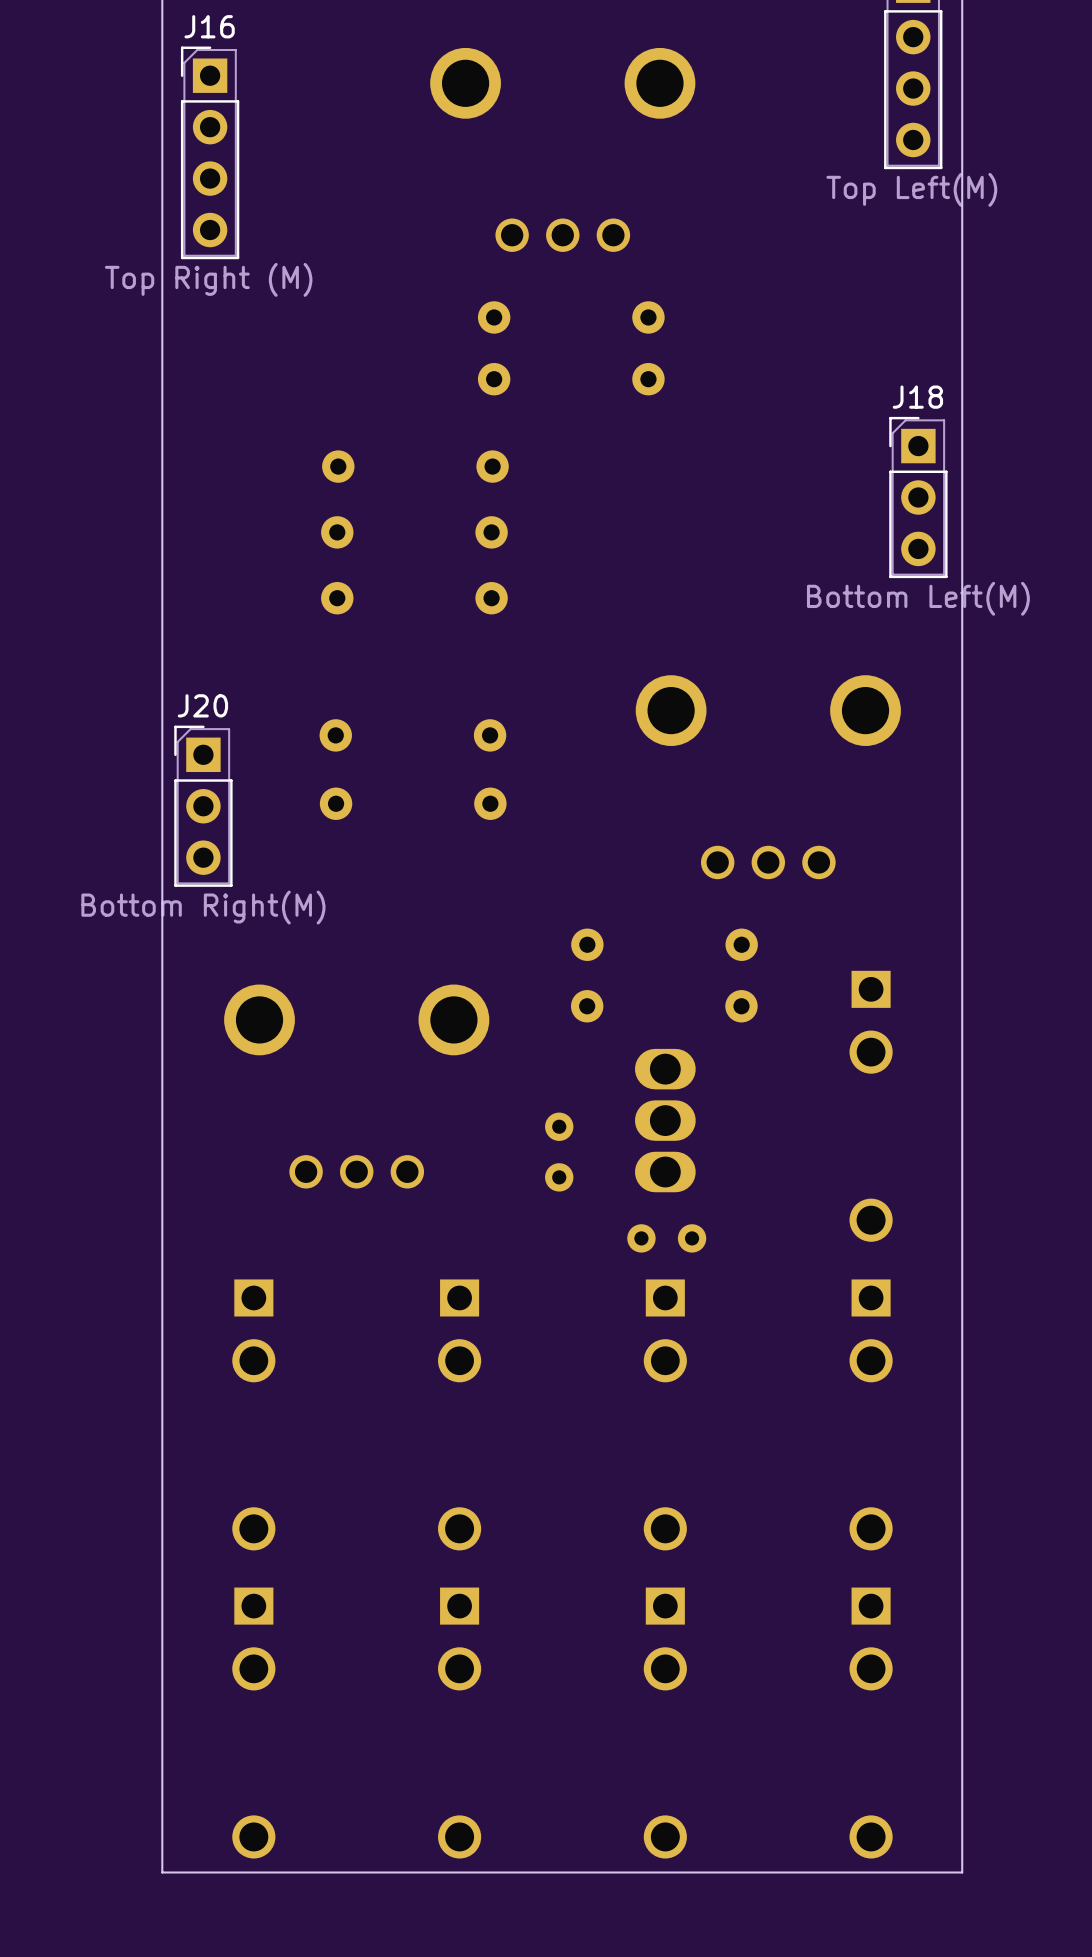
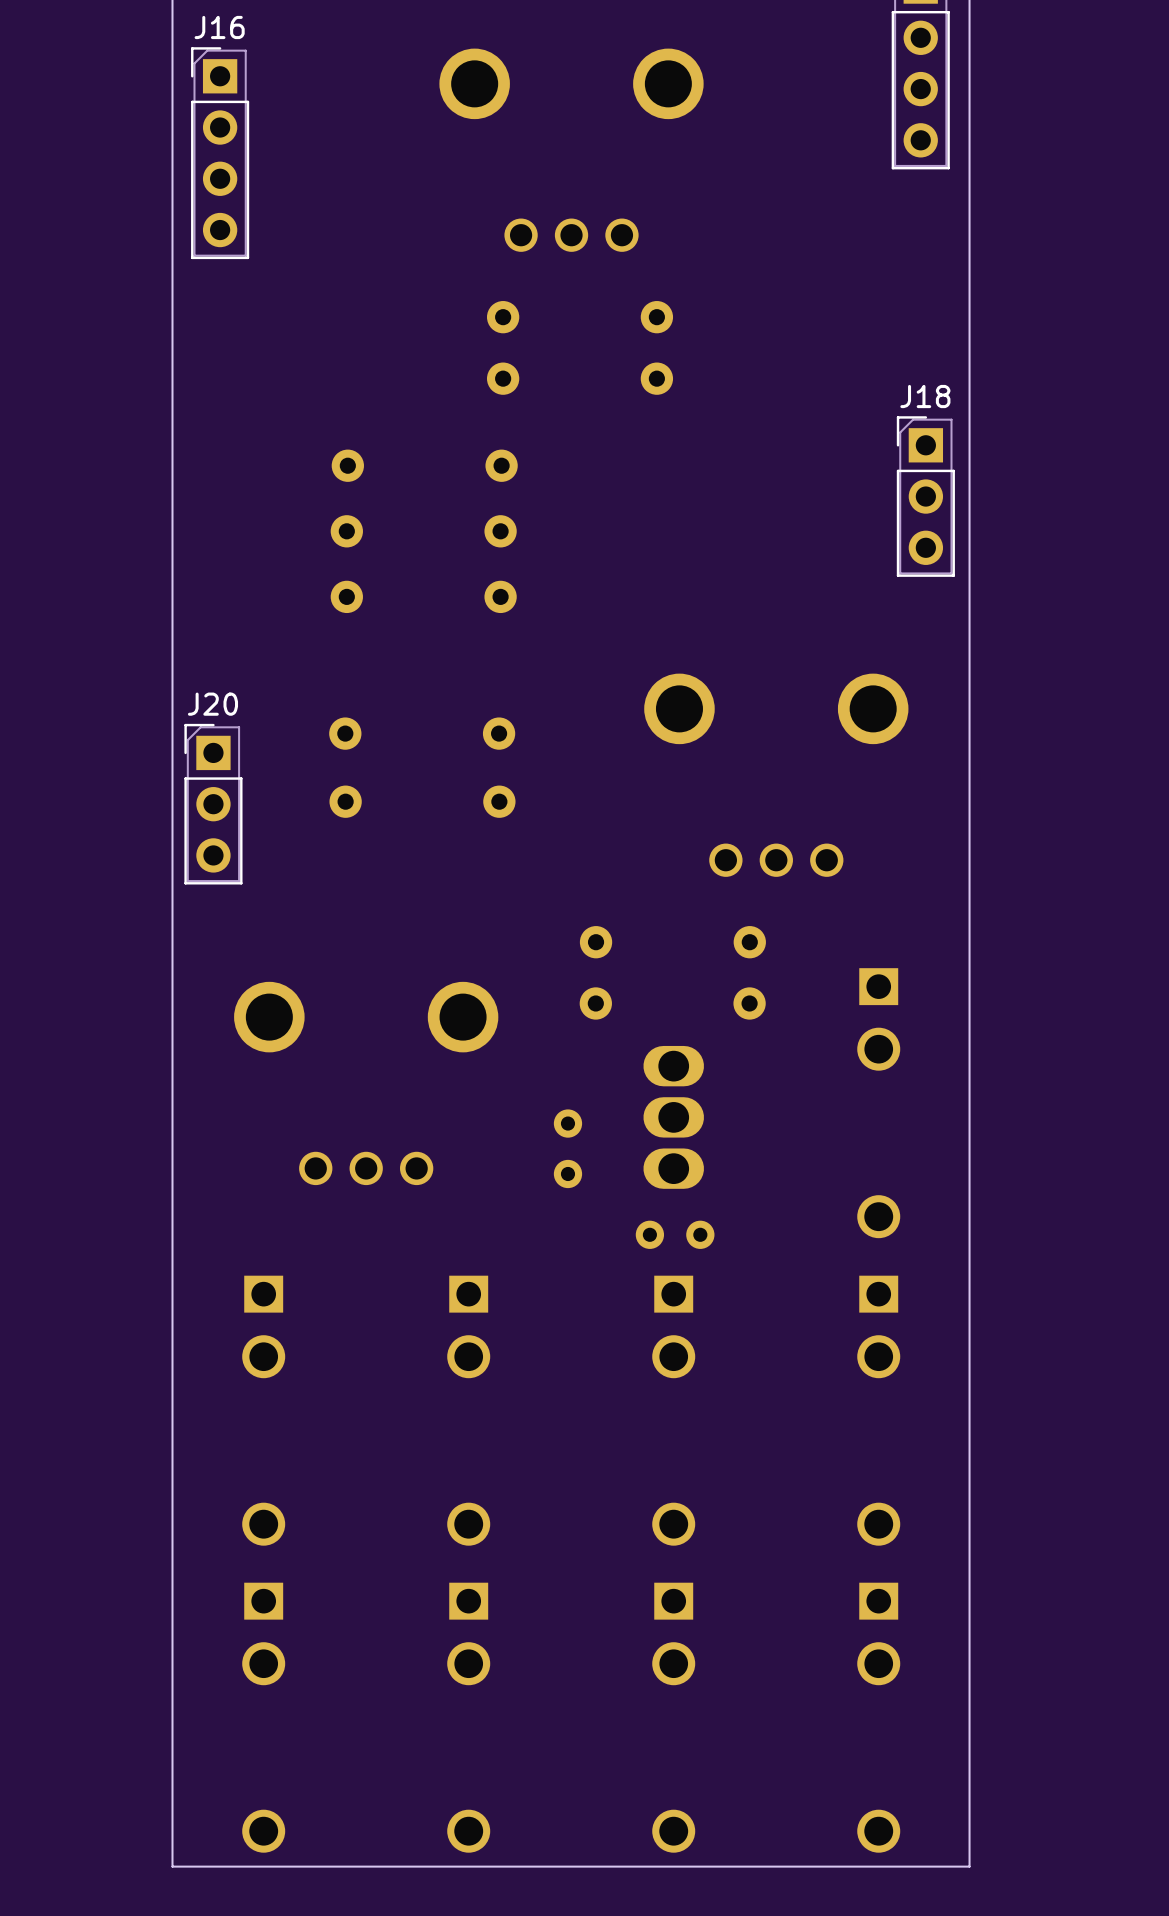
part value: Top Left(M) (911, 189) -> none
J16 value: Top Right (M) (208, 279) -> none
J18 value: Bottom Left(M) (918, 598) -> none
J20 value: Bottom Right(M) (203, 907) -> none

